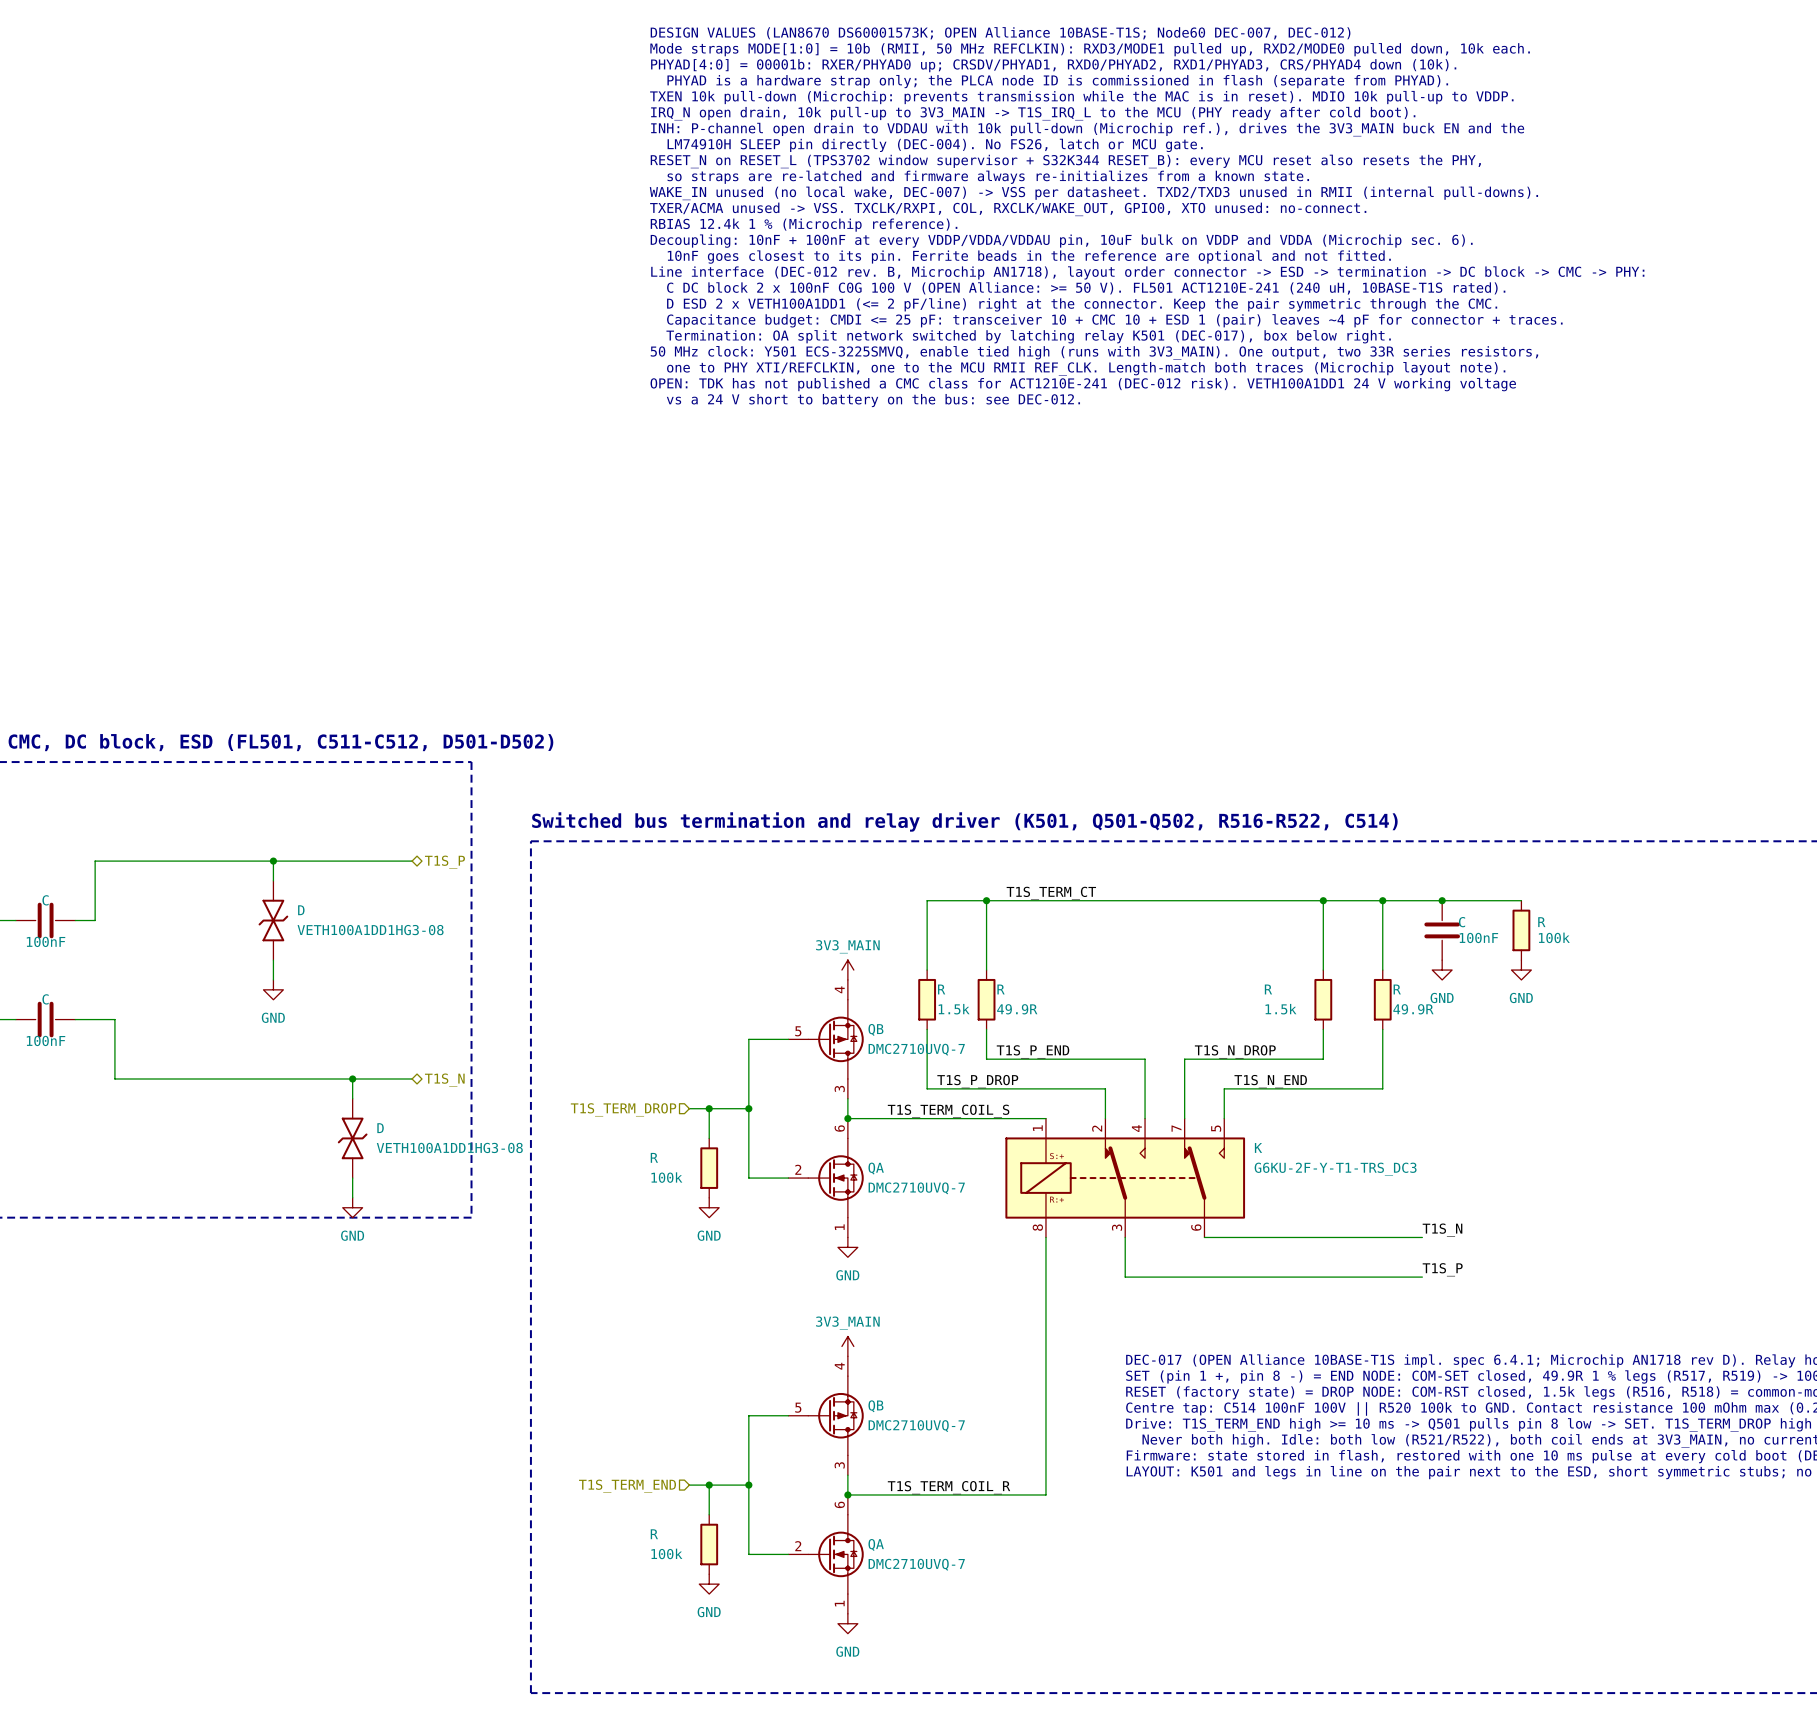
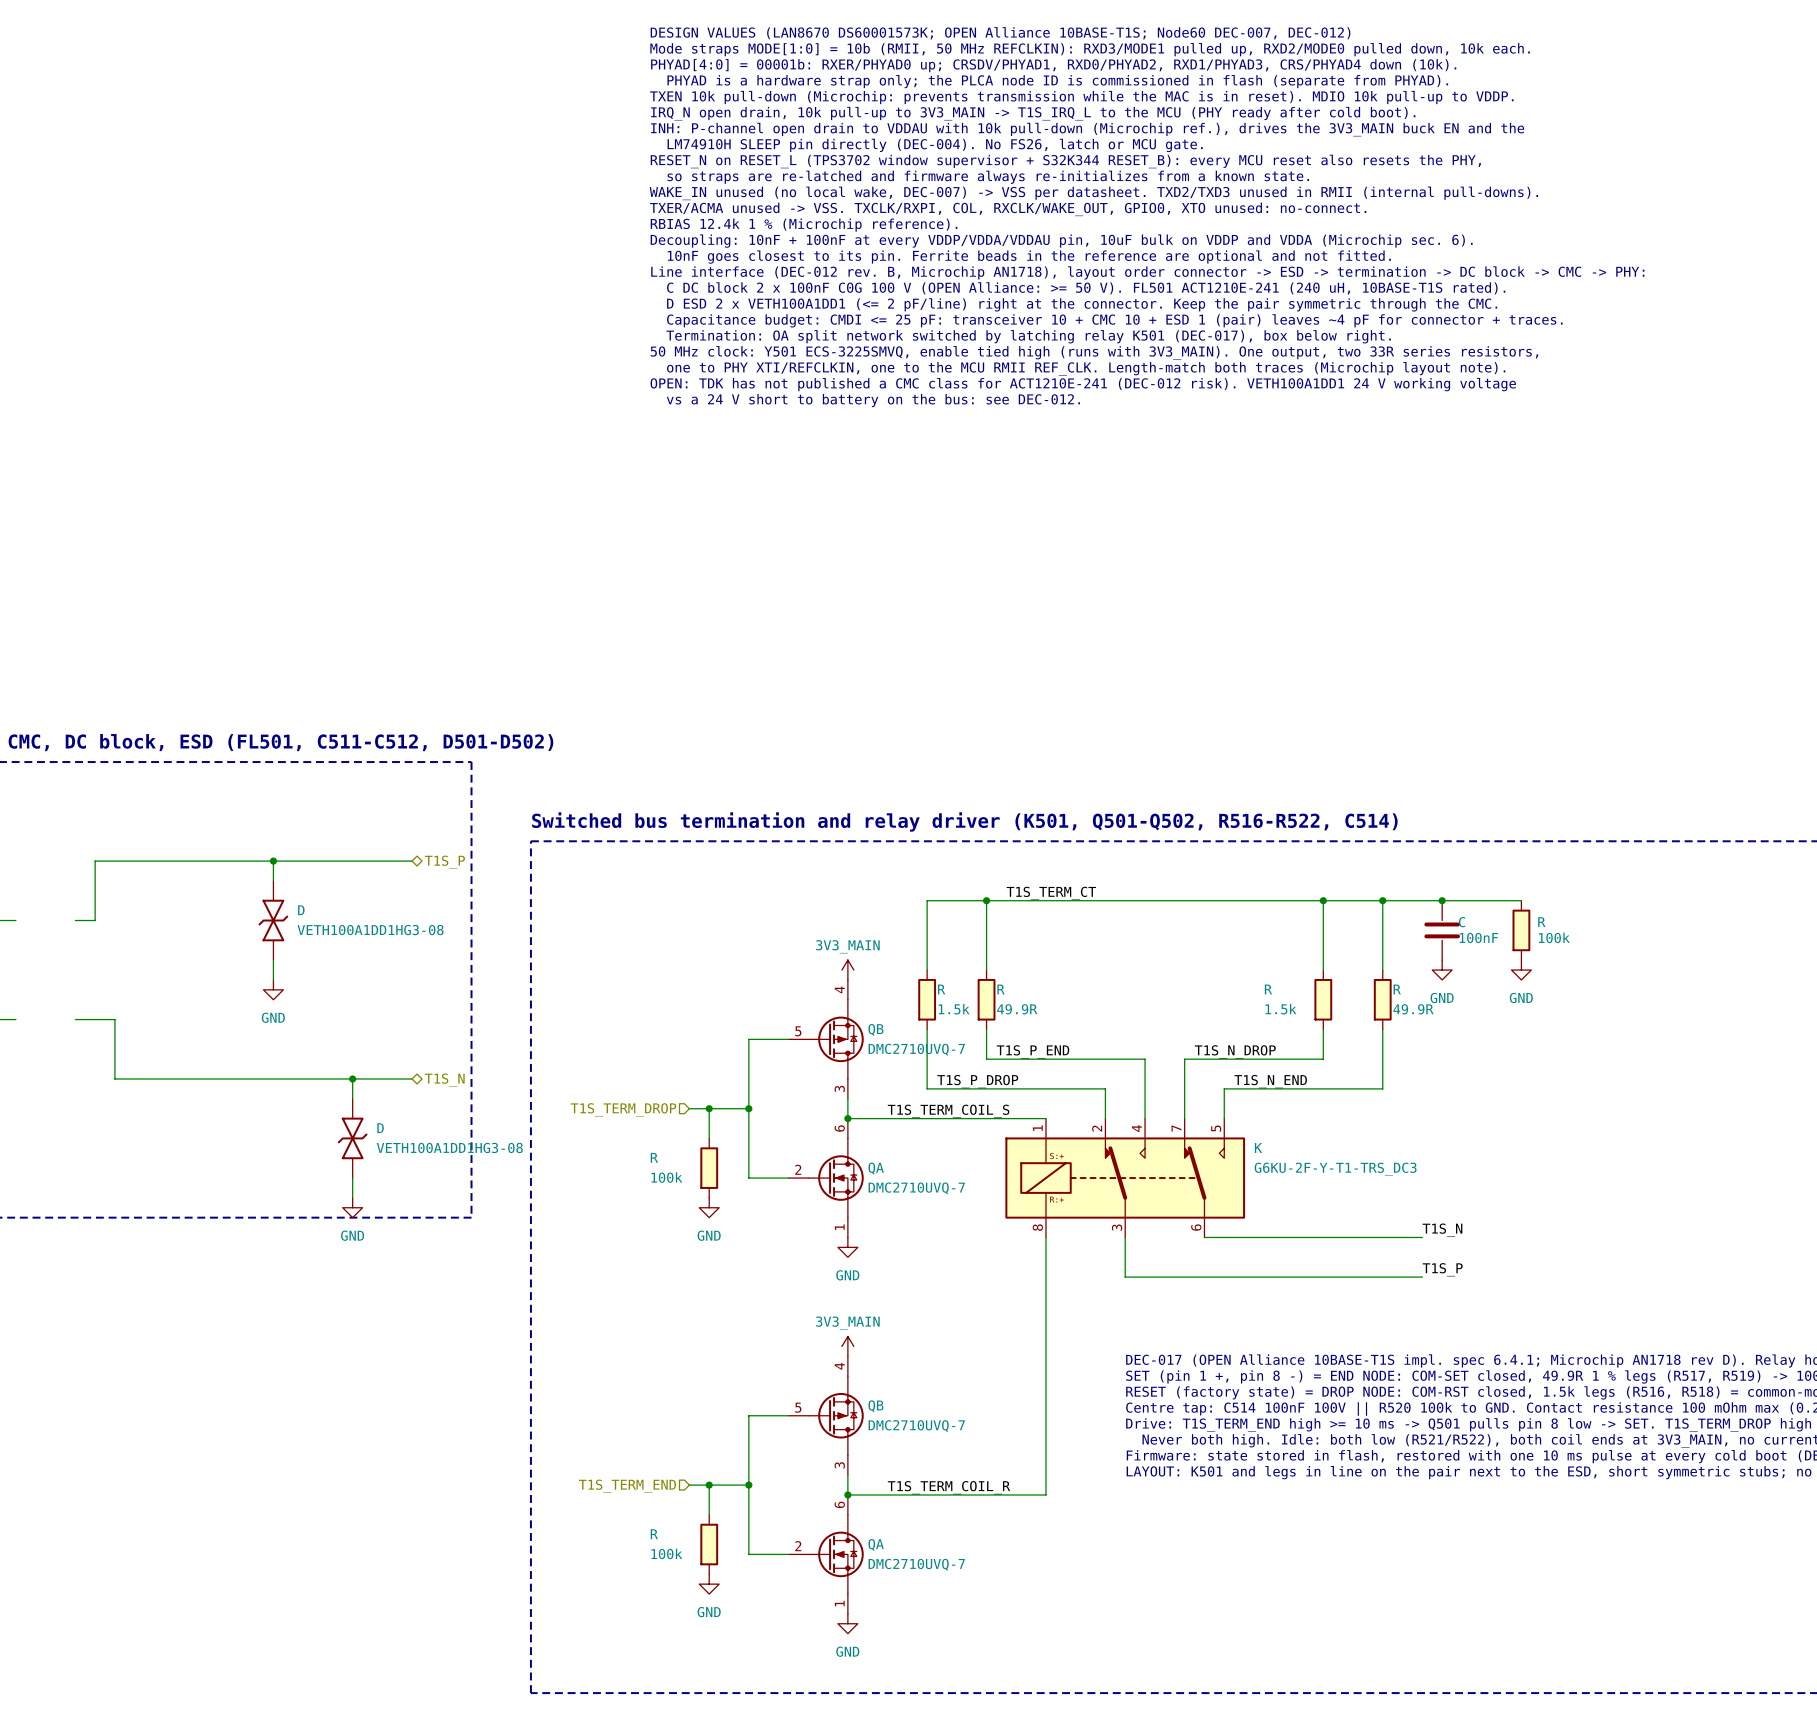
C: 100nF (45, 920) -> none
C: 100nF (45, 1019) -> none

